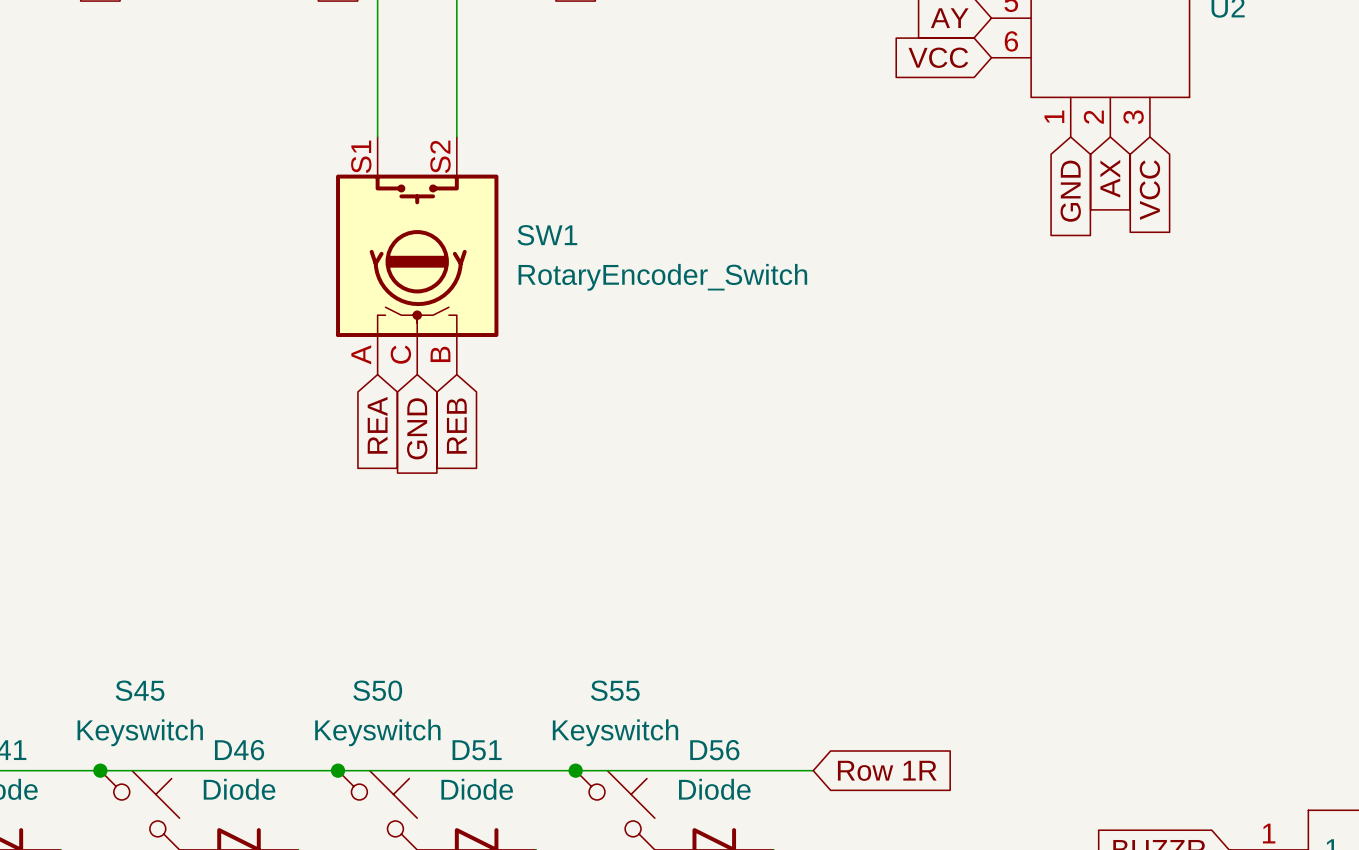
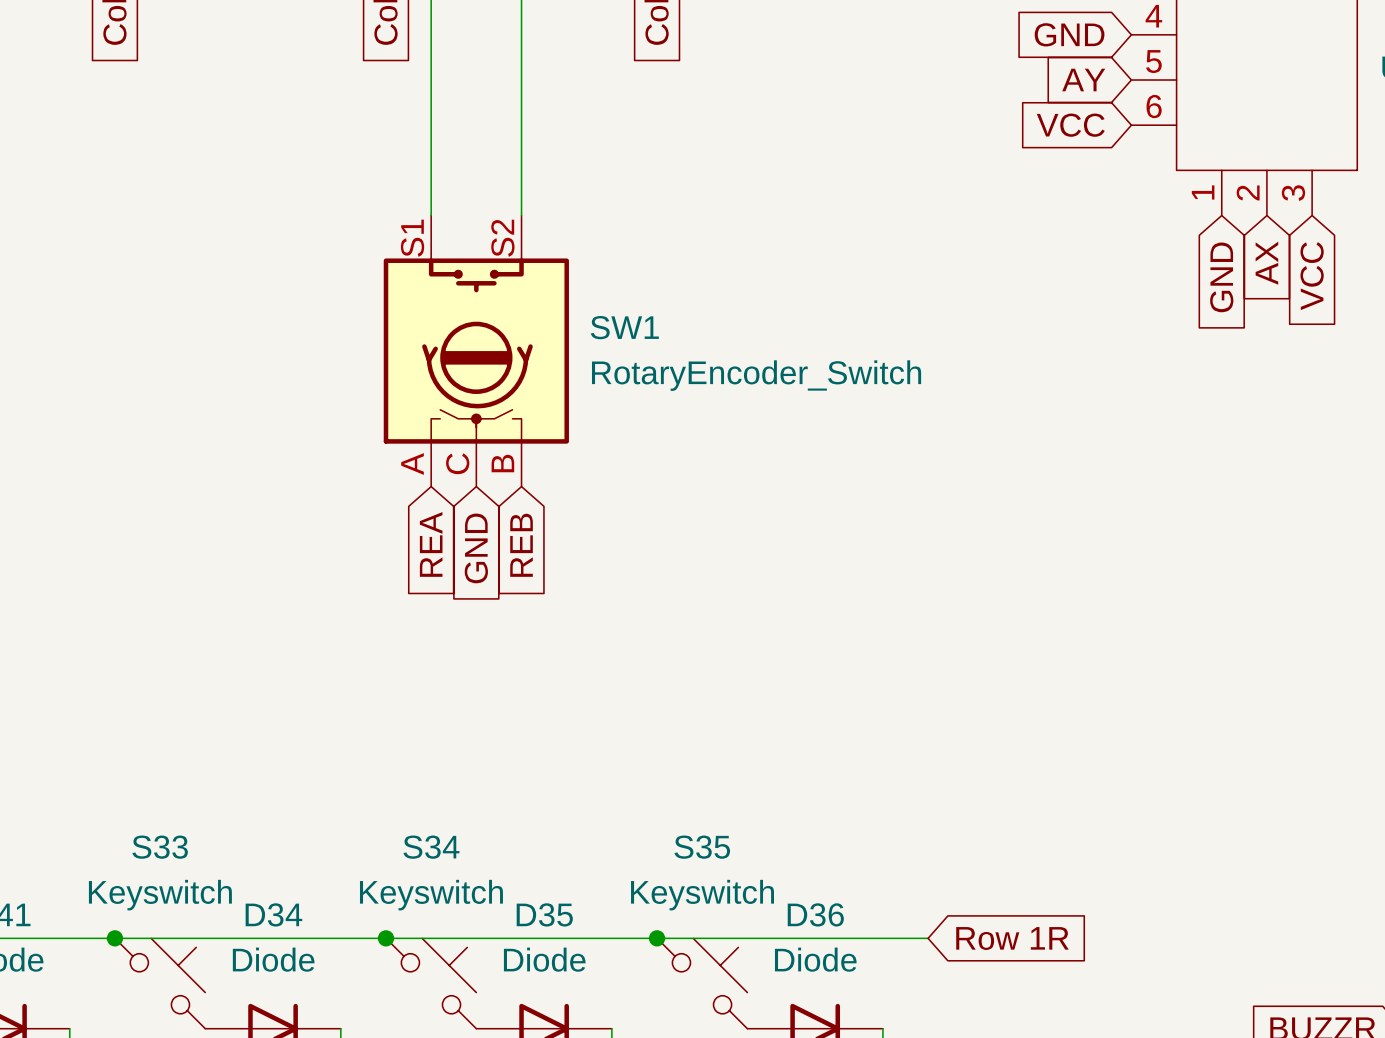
S45 name: S45 (140, 690) -> S33 (160, 847)
S50 name: S50 (377, 690) -> S34 (431, 847)
S55 name: S55 (615, 690) -> S35 (702, 847)
D46 name: D46 (239, 750) -> D34 (273, 914)
D51 name: D51 (477, 750) -> D35 (544, 914)
D56 name: D56 (714, 750) -> D36 (815, 914)

